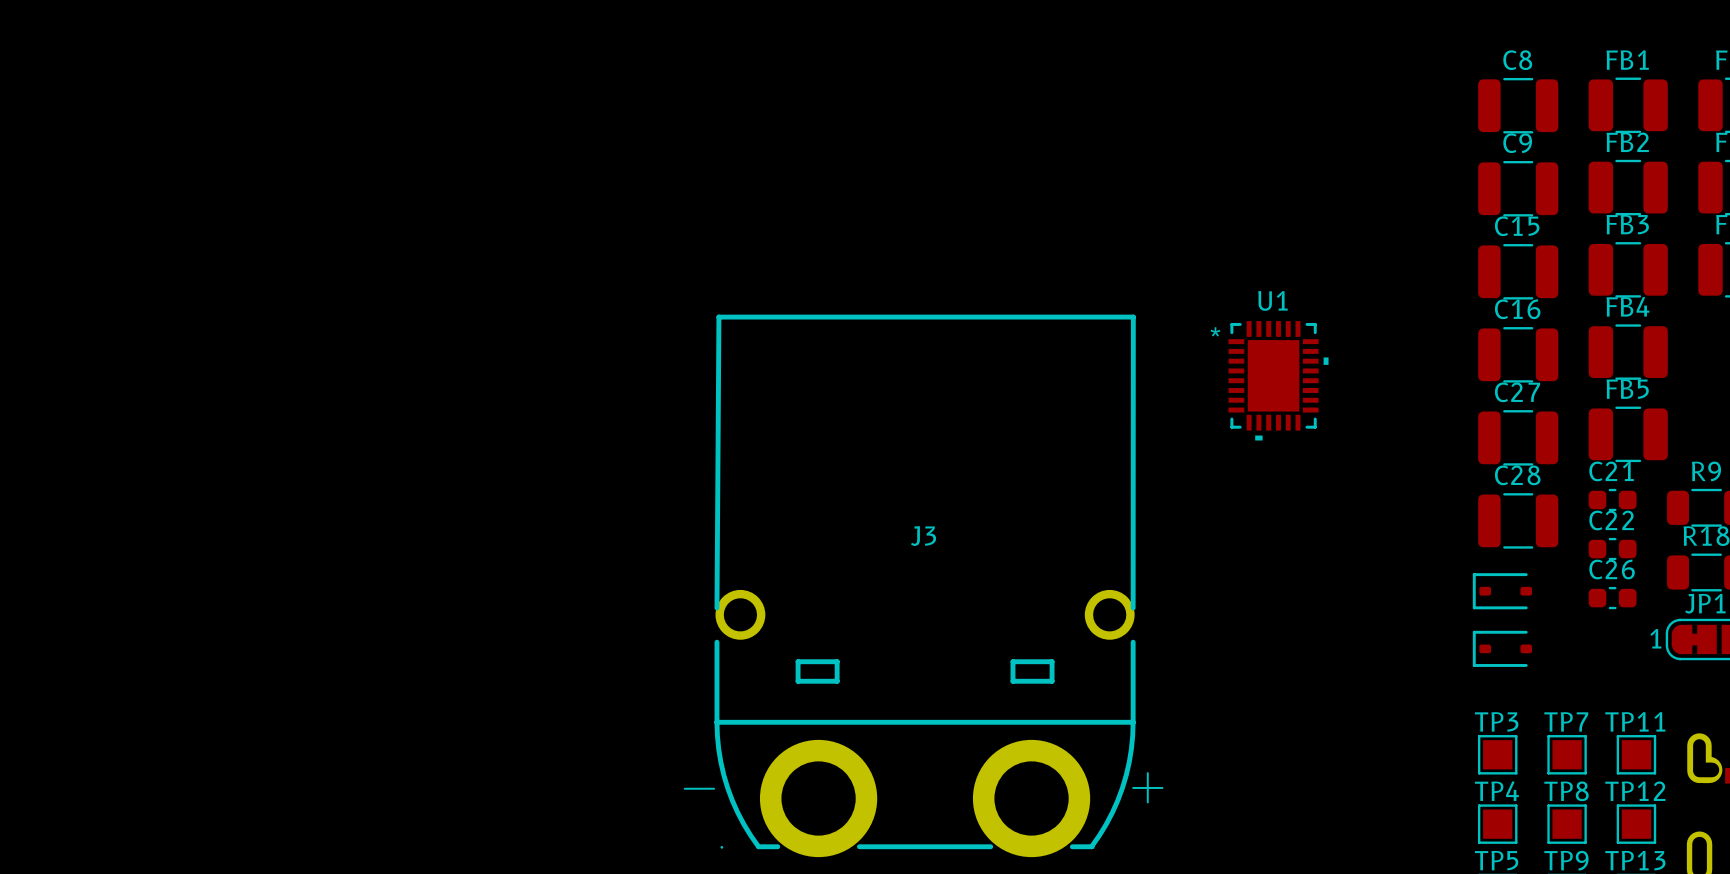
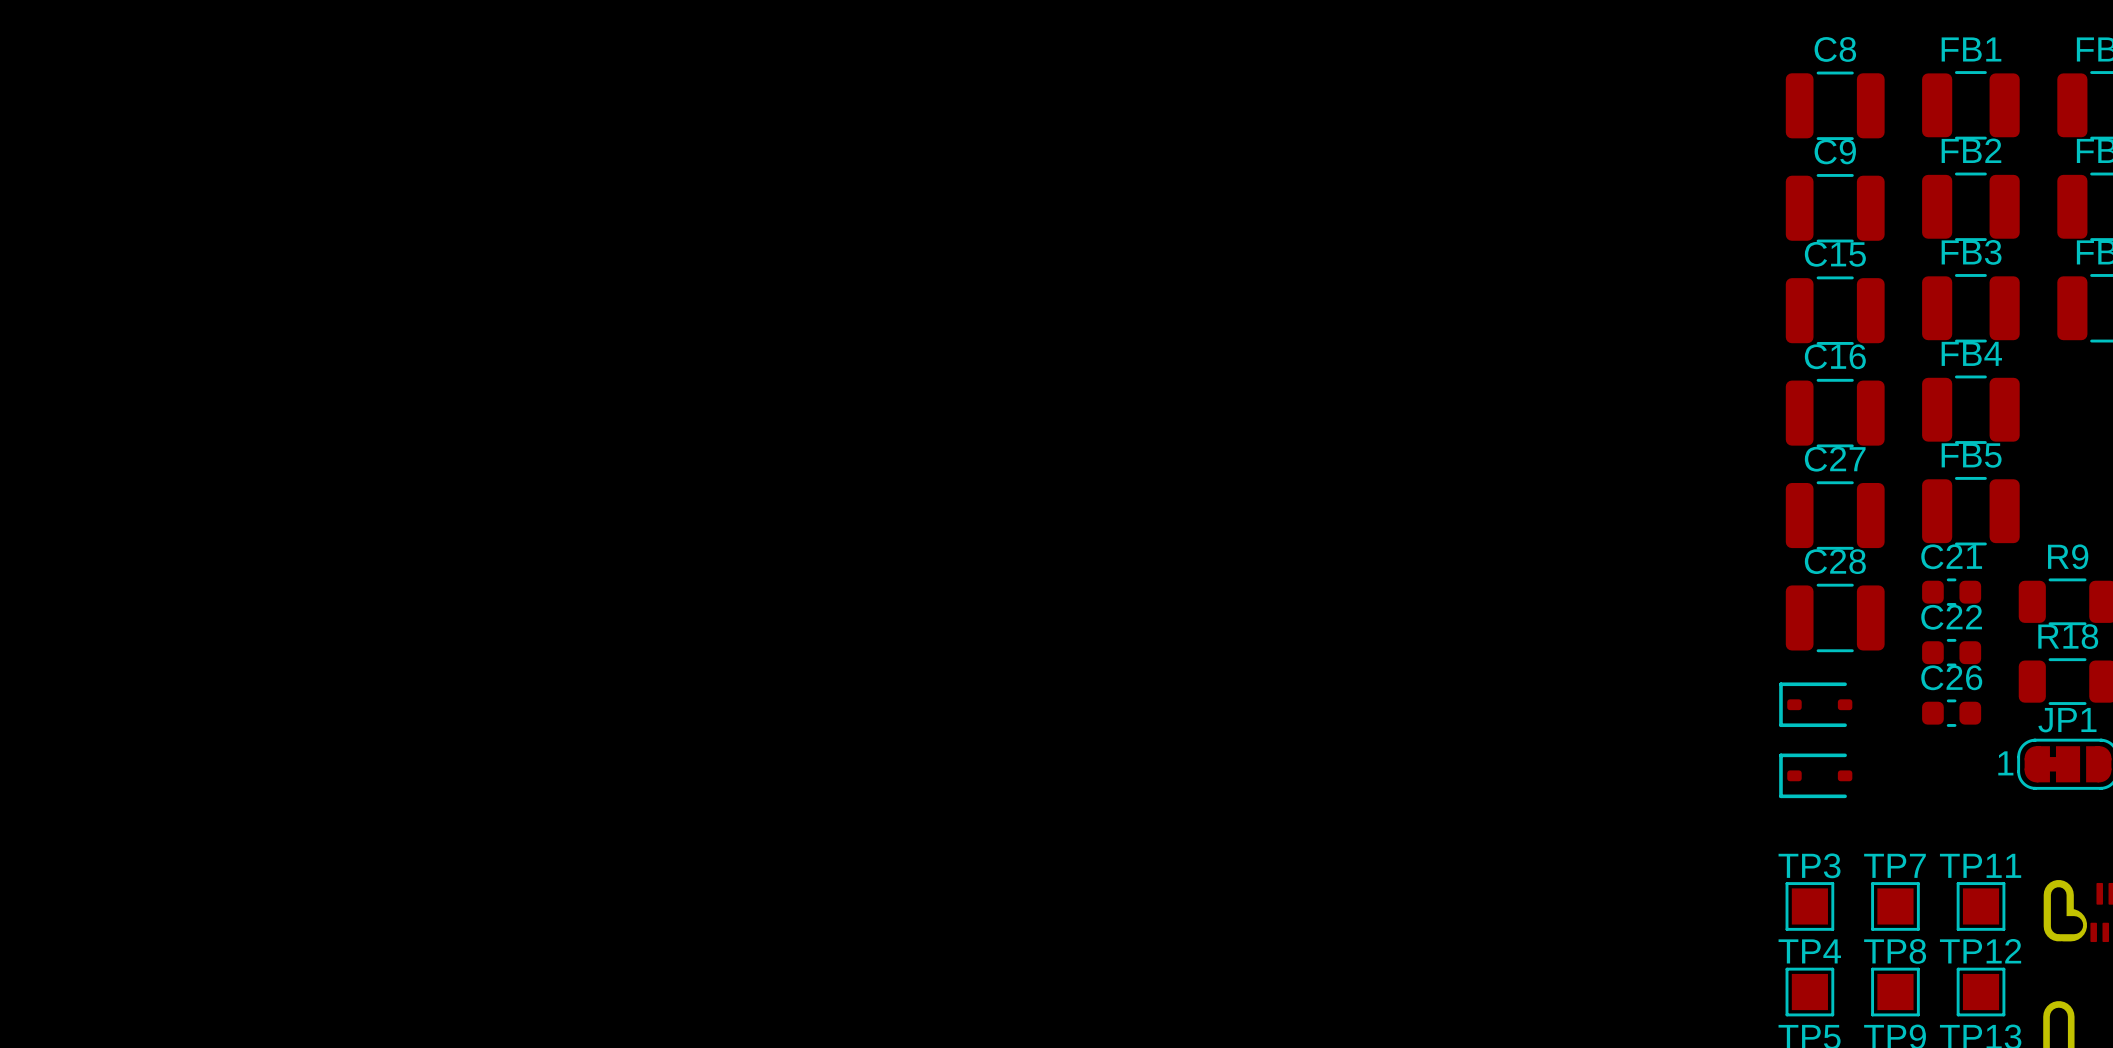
U1: (1278, 380) -> none
J3: (923, 585) -> none

